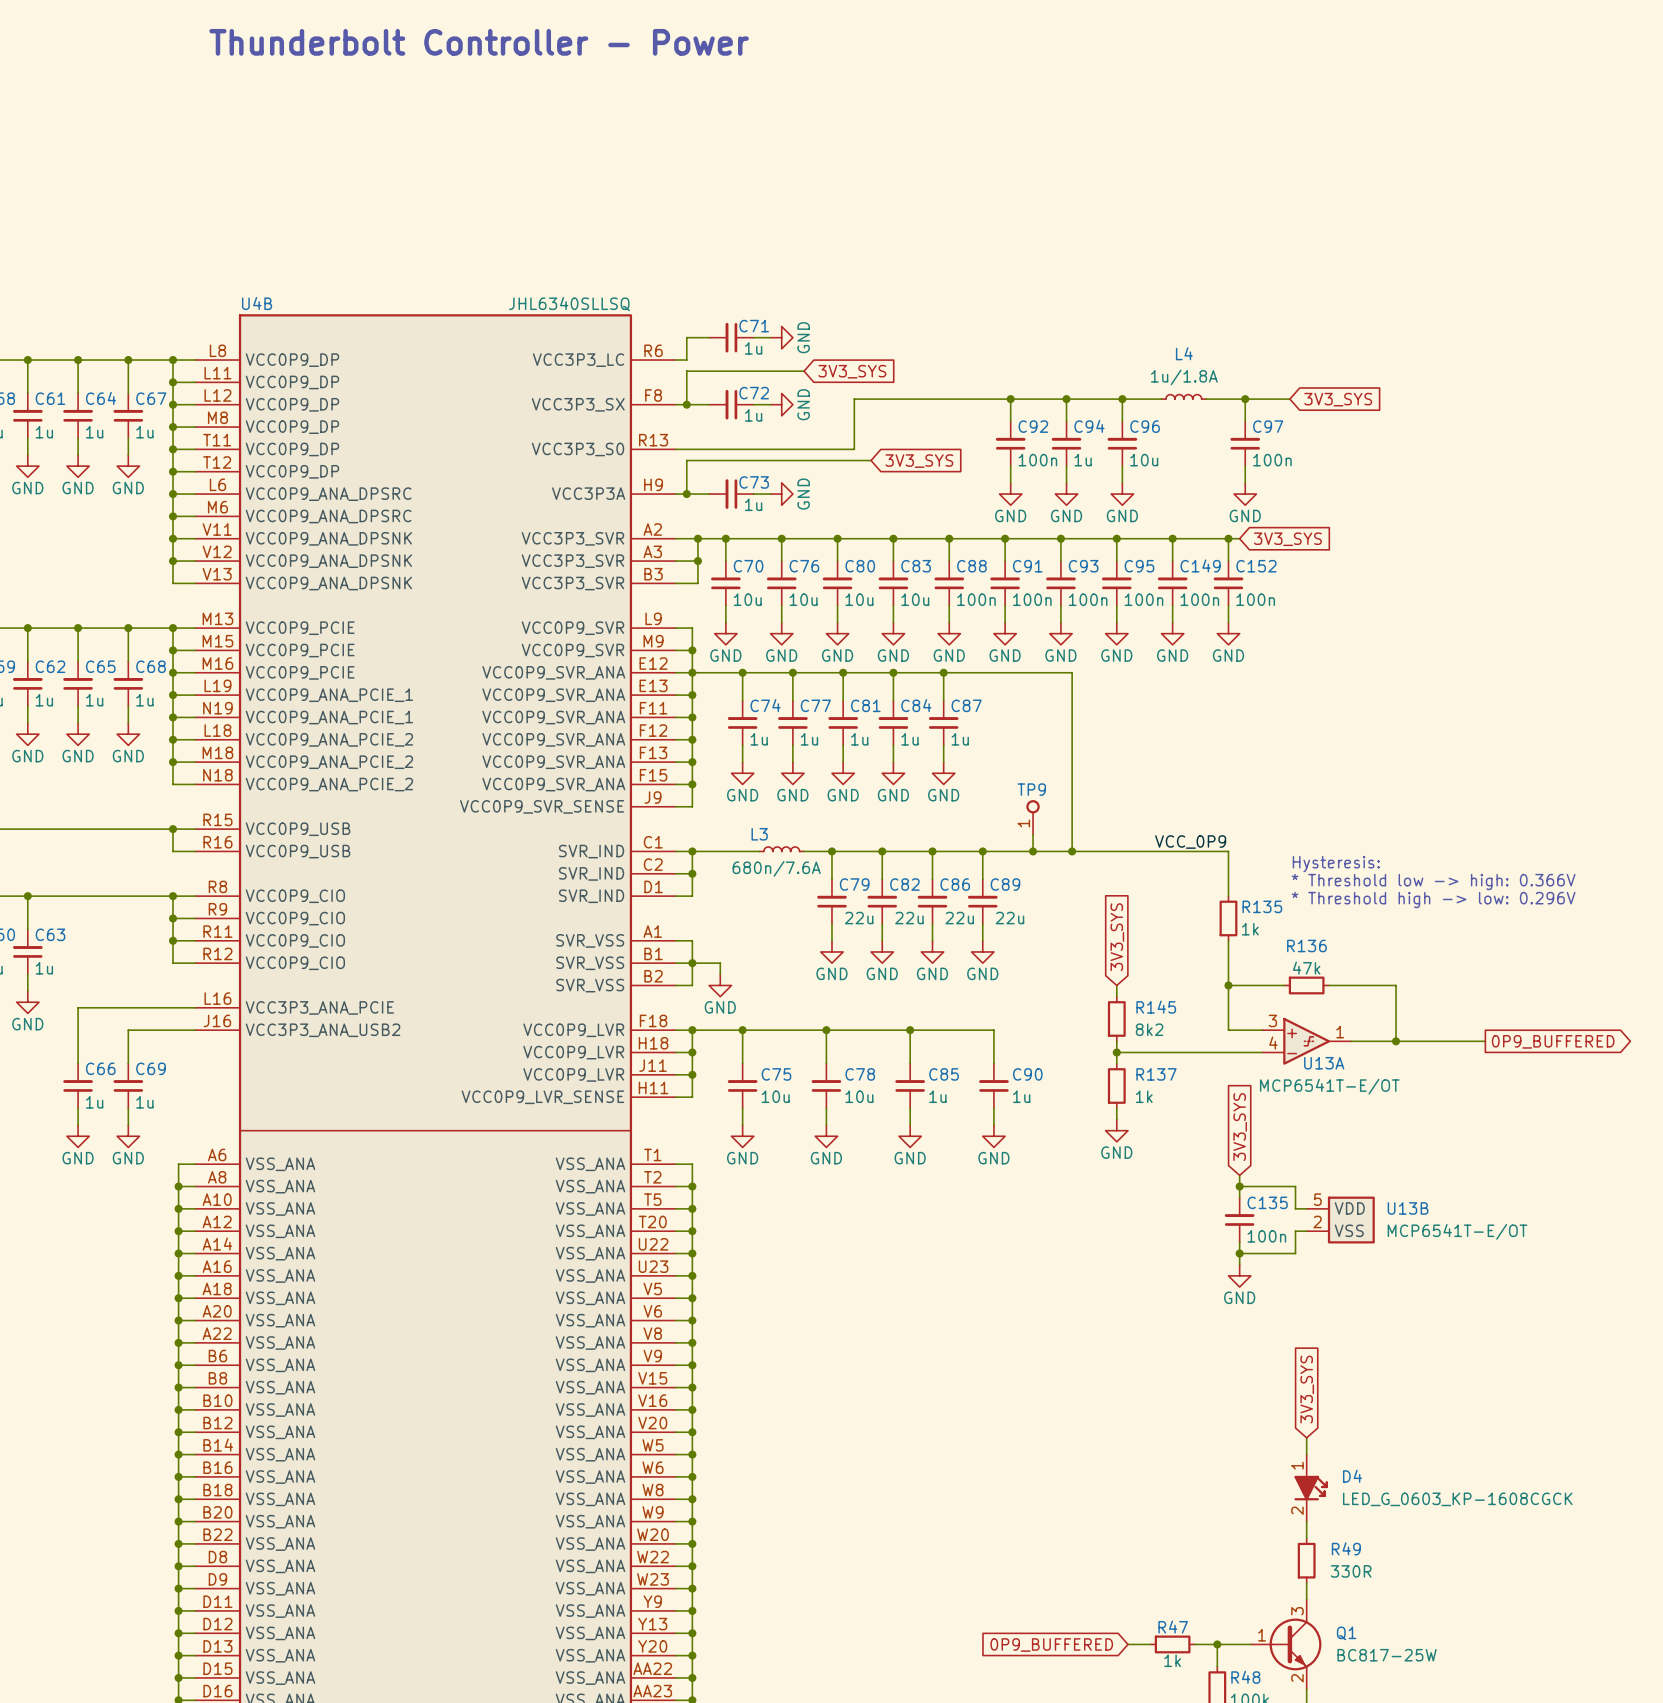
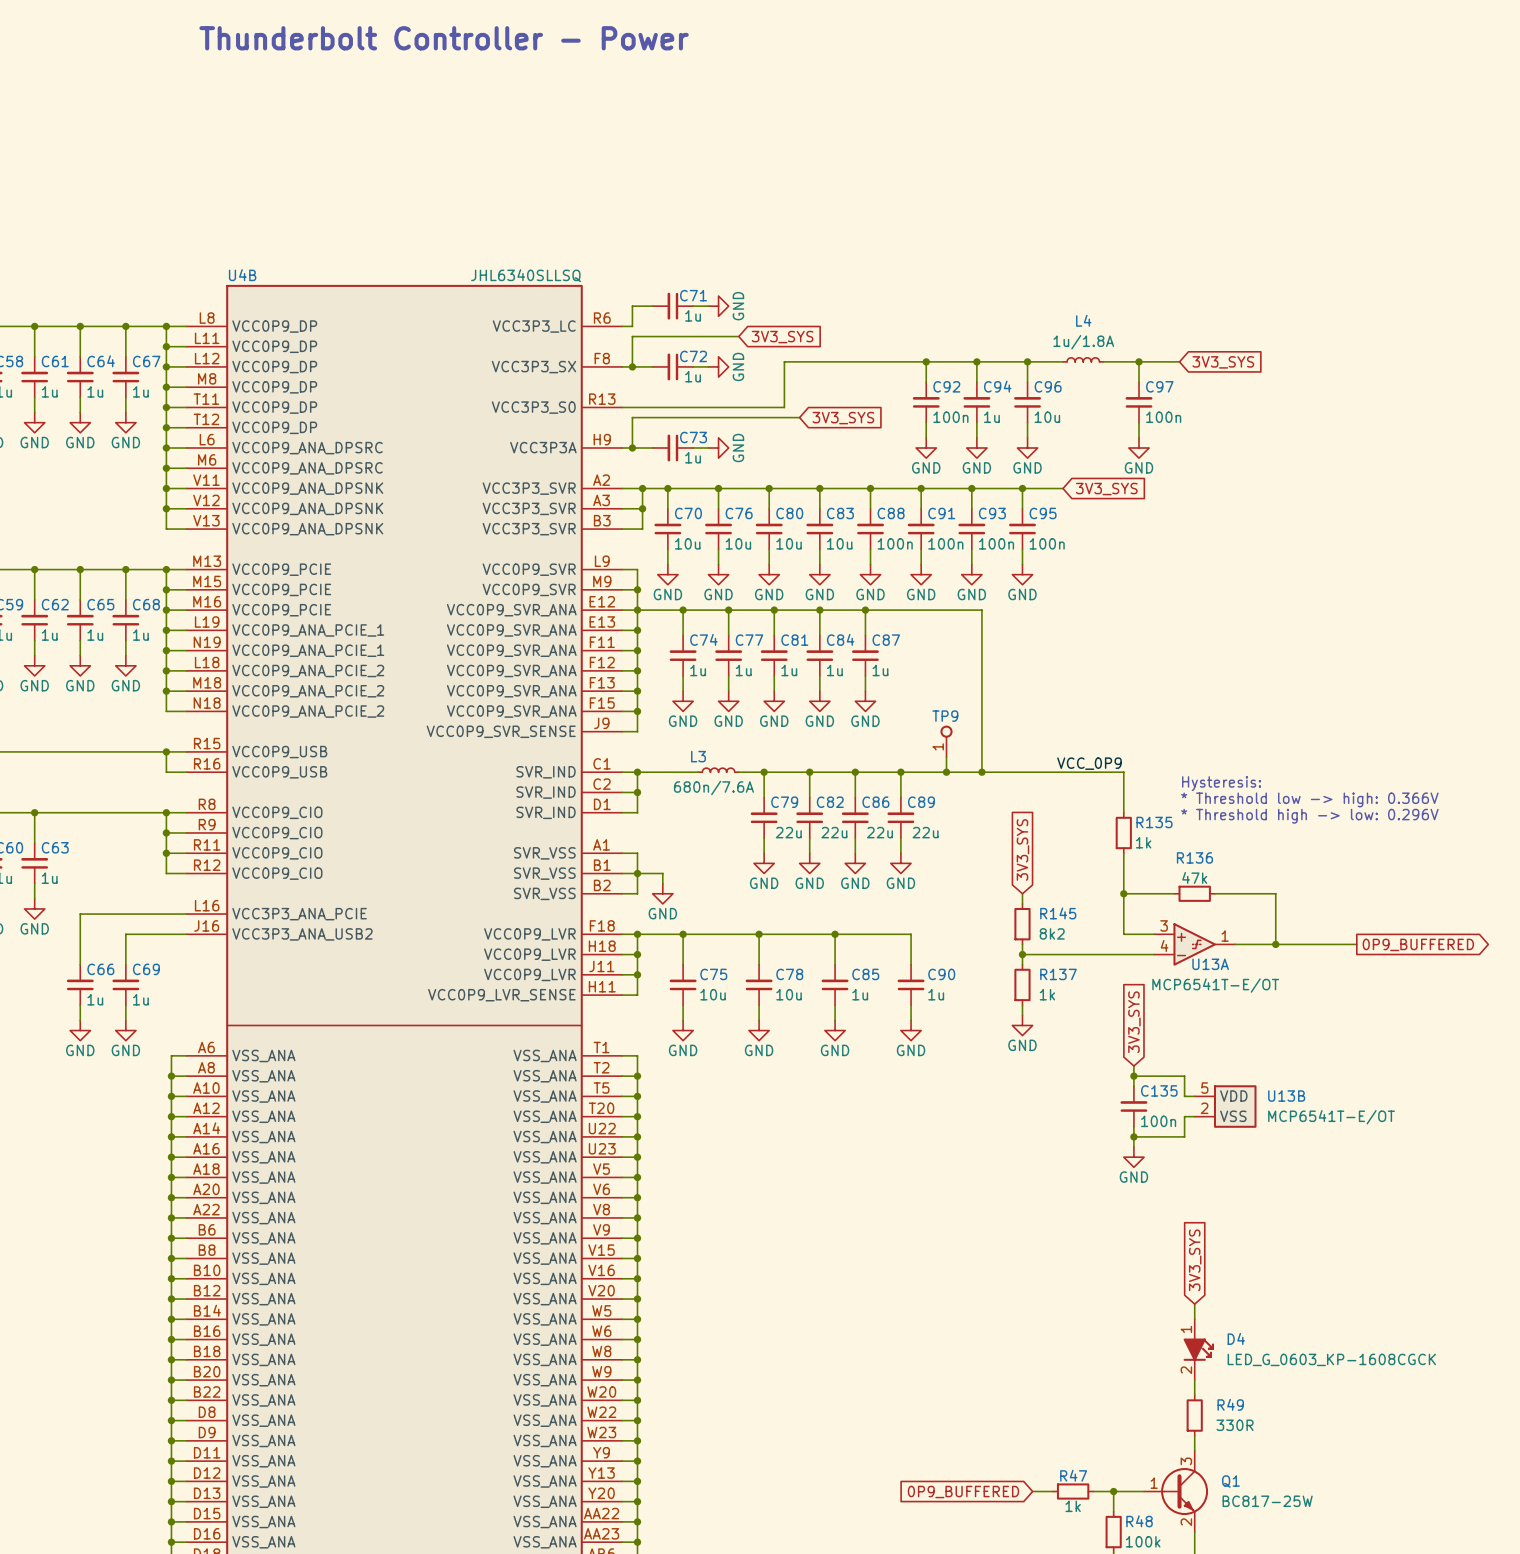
wire: (1161, 538) (1239, 538) -> none
wire: (1172, 538) (1172, 561) -> none
junction: (1172, 538) -> none
wire: (1228, 538) (1228, 561) -> none
junction: (1228, 538) -> none
global label position: 3V3_SYS (1287, 539) -> 3V3_SYS (1106, 489)
C149: (1172, 583) -> none
C152: (1228, 583) -> none
wire: (1172, 605) (1172, 622) -> none
wire: (1228, 605) (1228, 622) -> none
power symbol: GND (1172, 633) -> none
power symbol: GND (1228, 633) -> none

